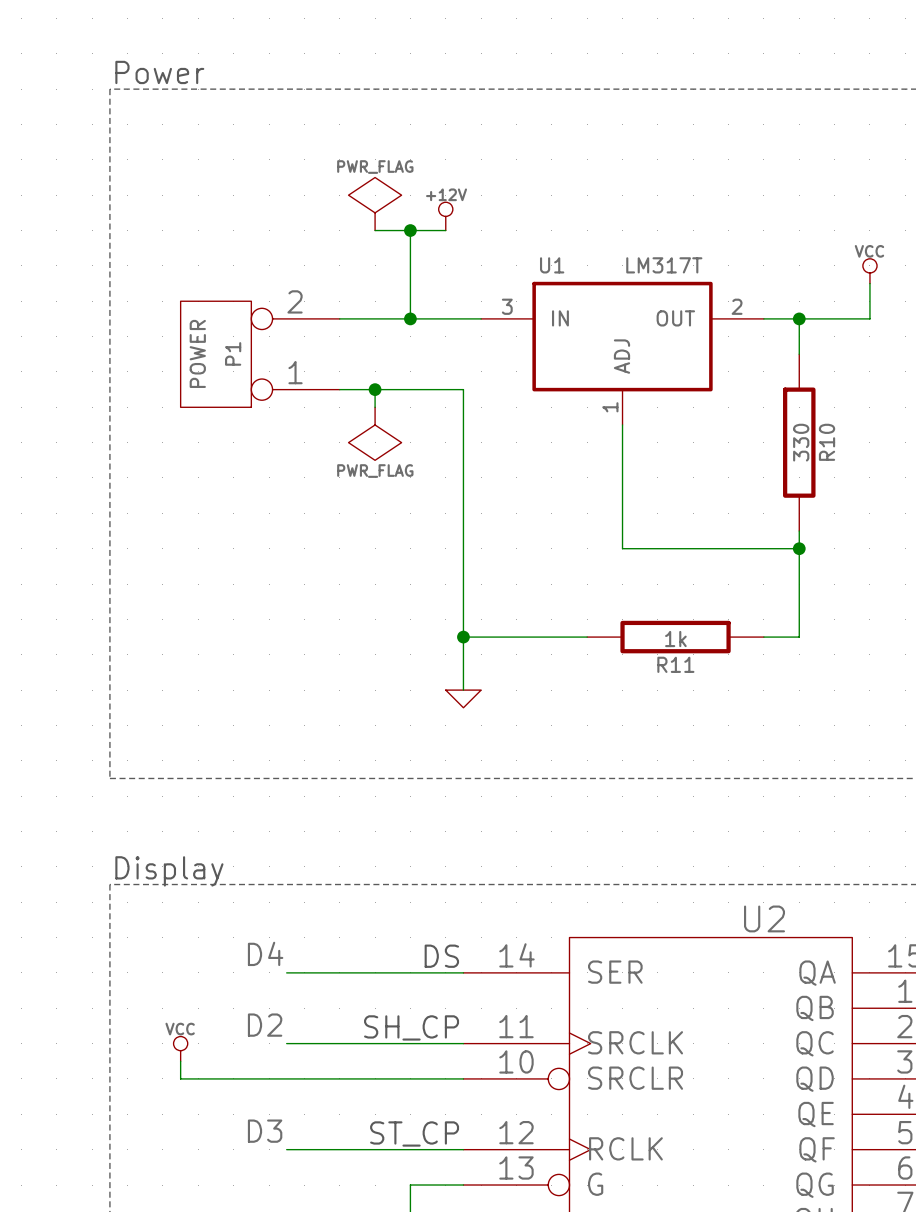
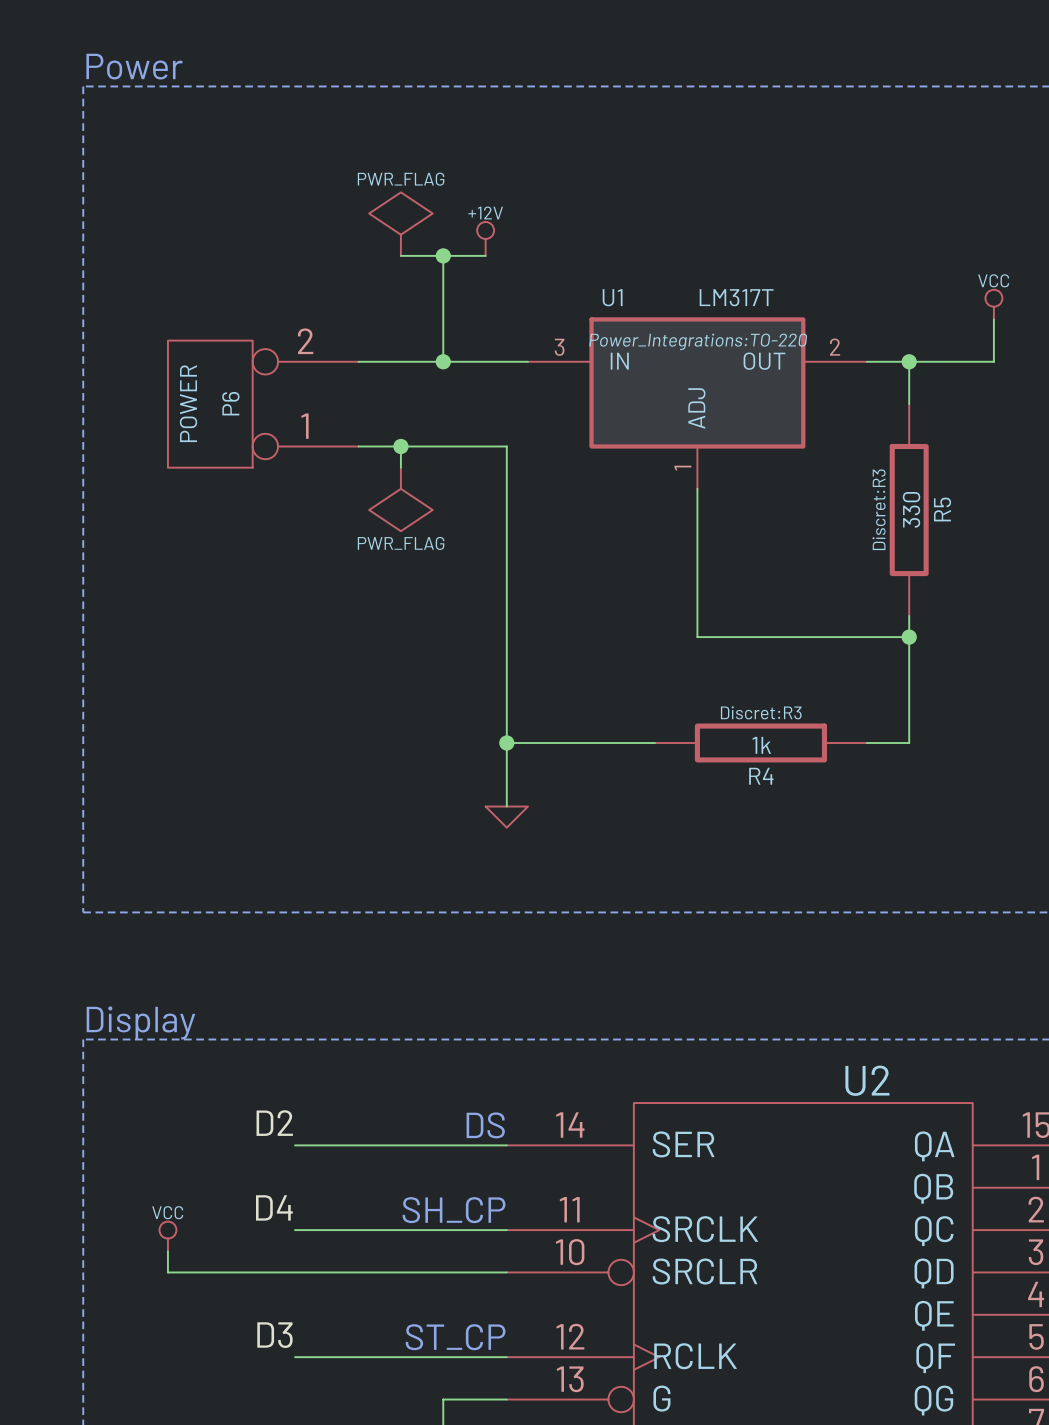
U1 text: none -> Power_Integrations:TO-220 (698, 341)
P1 name: P1 (233, 353) -> P6 (230, 403)
R10 text: none -> Discret:R3 (879, 509)
R10 name: R10 (827, 442) -> R5 (942, 509)
R11 text: none -> Discret:R3 (761, 712)
R11 name: R11 (675, 664) -> R4 (761, 776)
label: D4 (265, 953) -> D2 (274, 1123)
label: D2 (265, 1025) -> D4 (274, 1207)

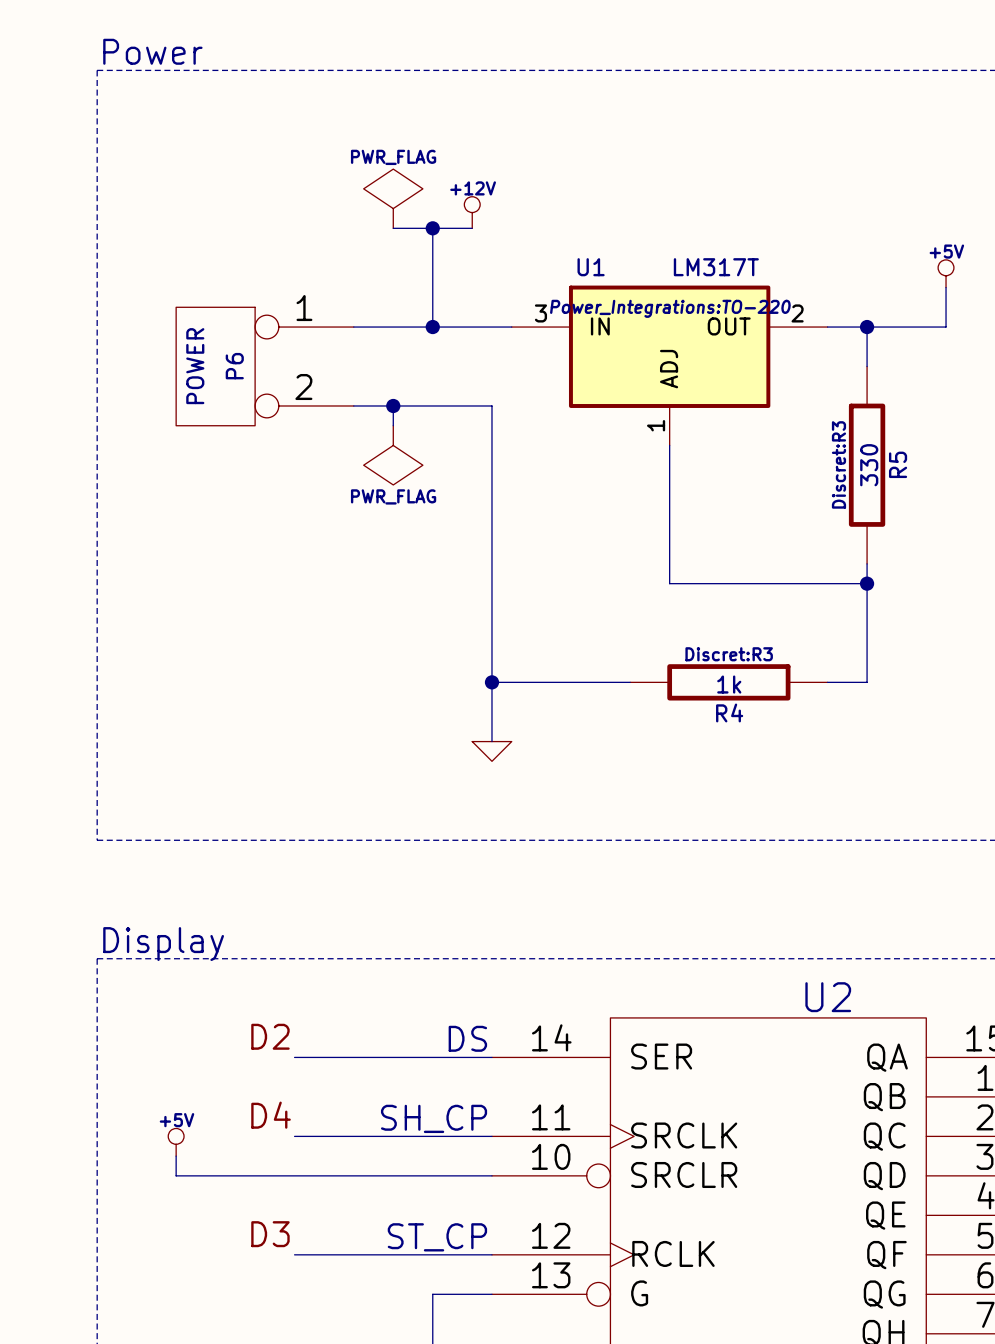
power symbol: VCC (993, 304) -> +5V (946, 273)
P6 flip: as is (210, 404) -> up-down (215, 366)
power symbol: VCC (167, 1236) -> +5V (176, 1142)

